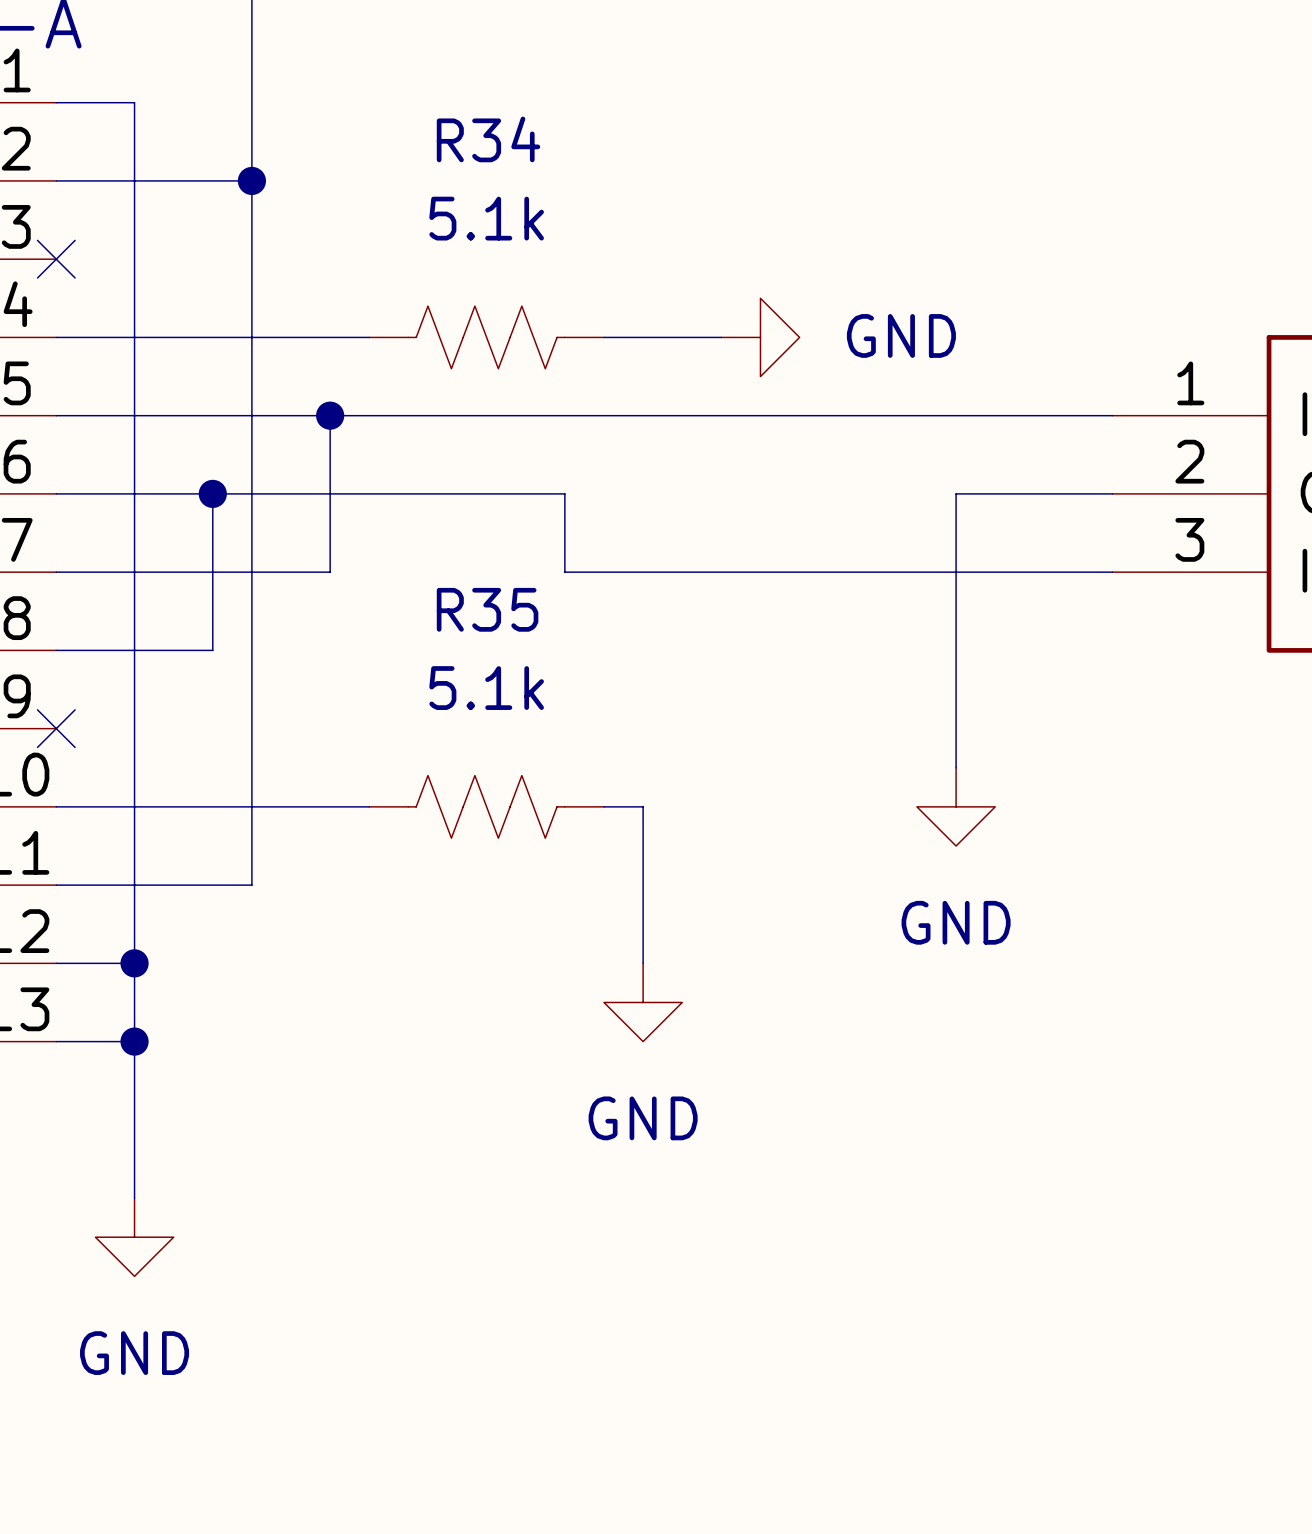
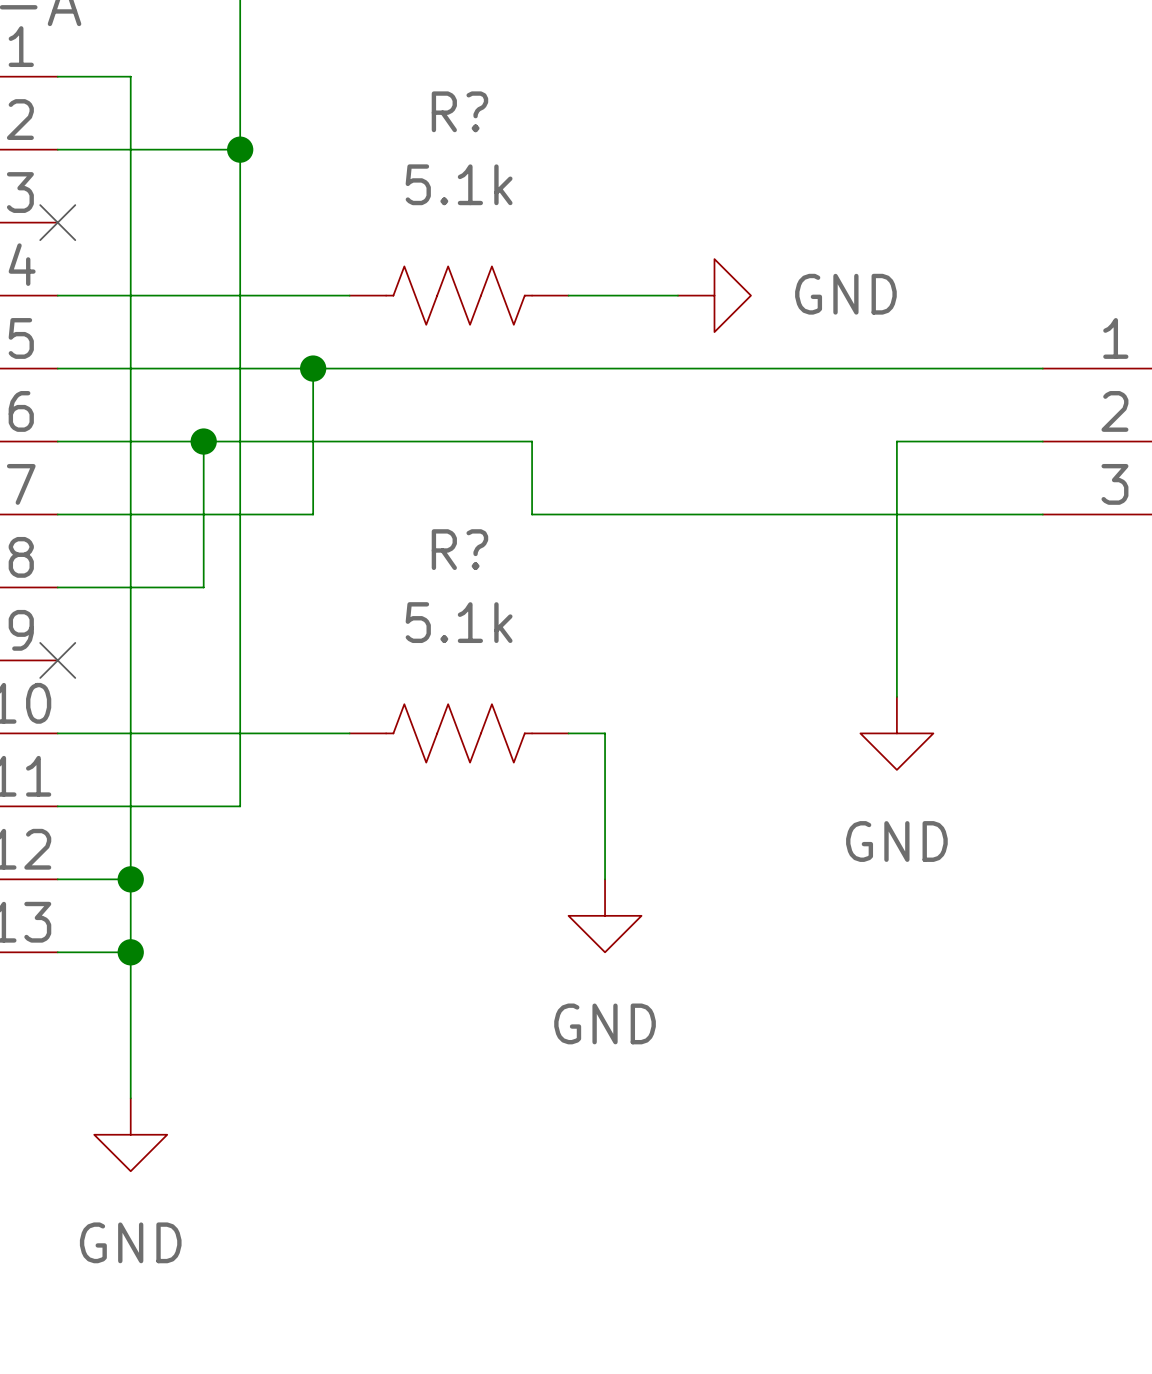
R34 name: R34 (488, 139) -> R? (459, 111)
R35 name: R35 (487, 609) -> R? (459, 549)

